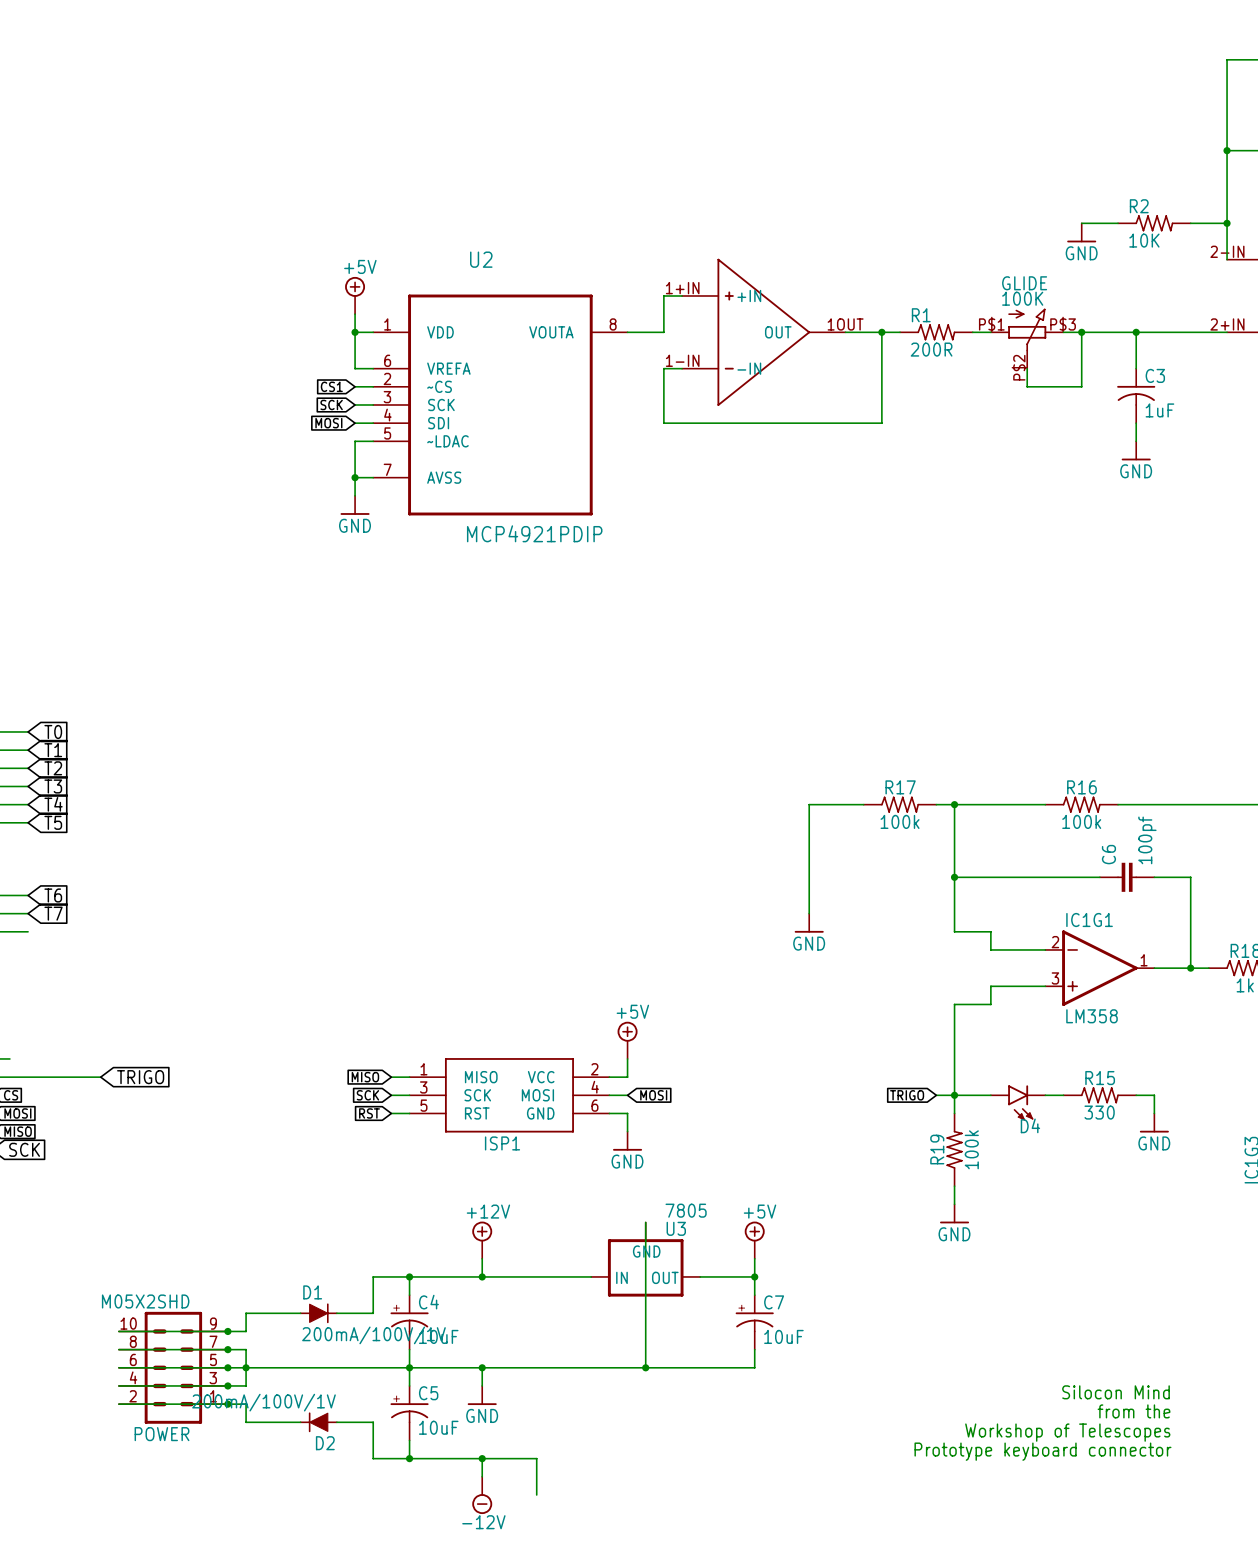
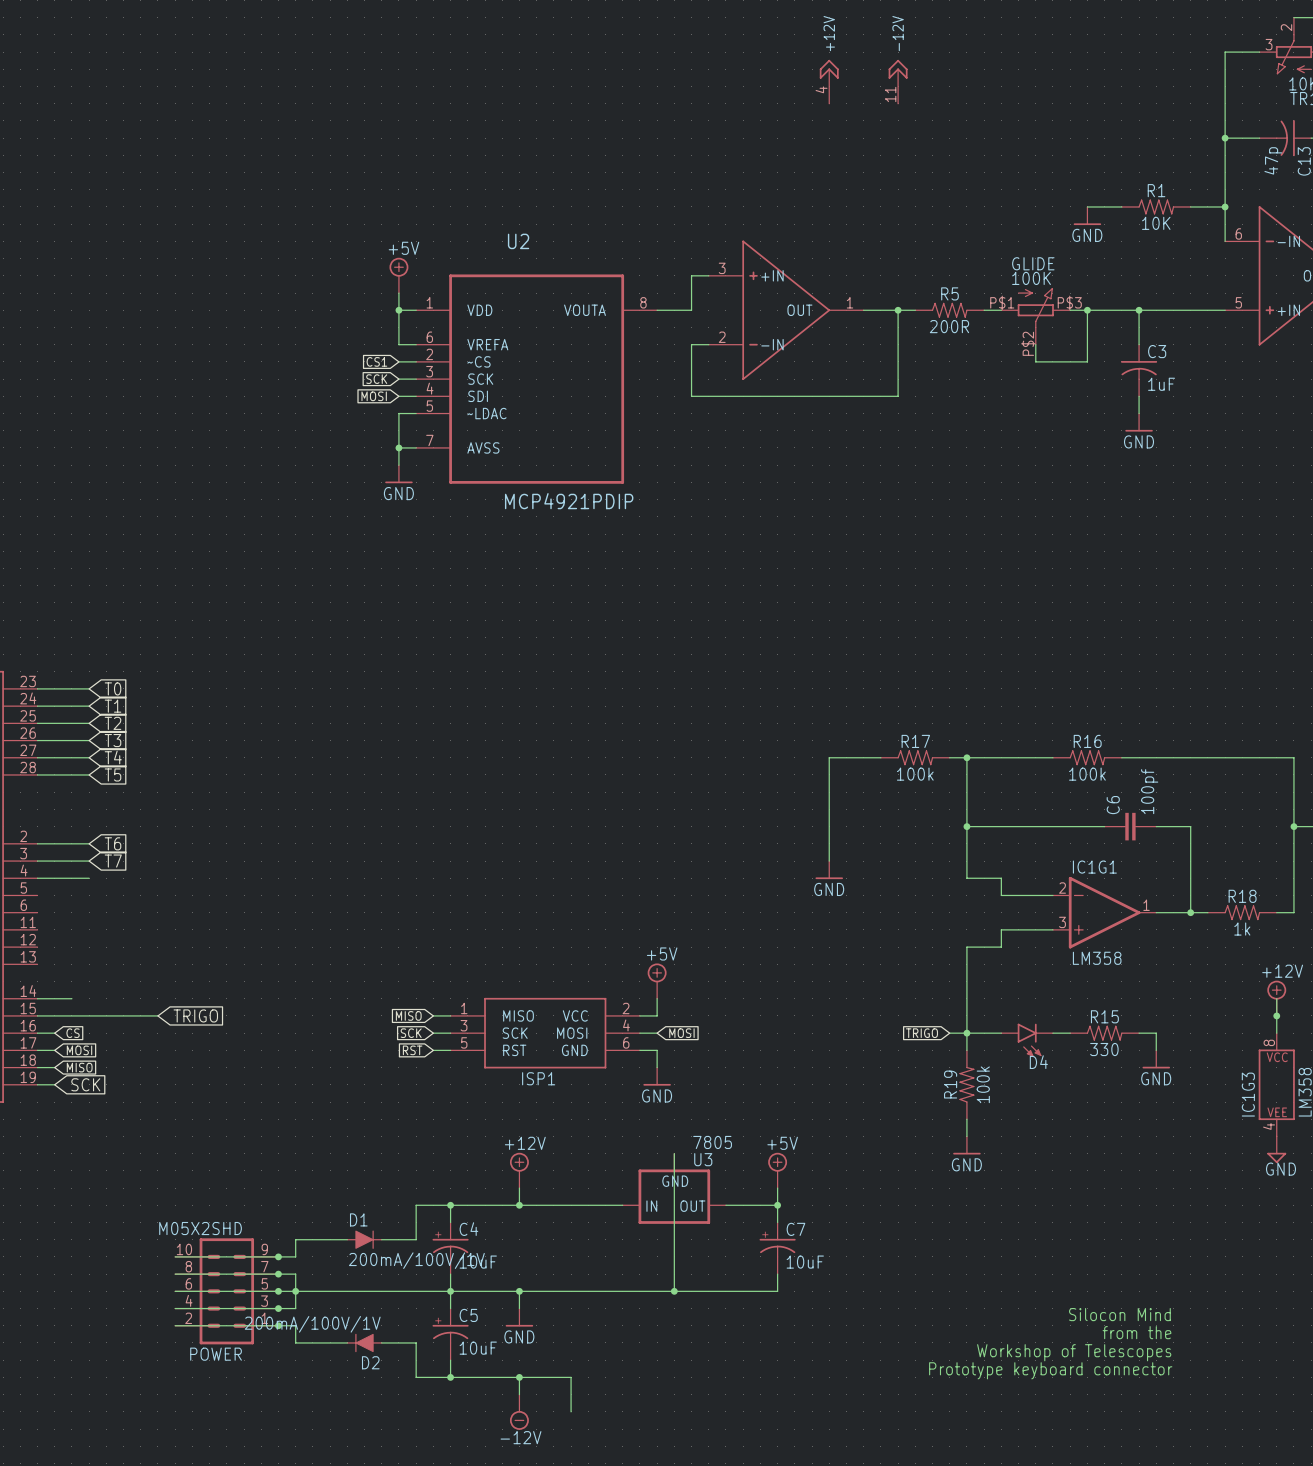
part: none -> (829, 81)
part: none -> (898, 81)
R2: 10K (1154, 223) -> none
part pin number: 2-IN (1227, 251) -> 6 (1238, 233)
part pin number: 1+IN (682, 288) -> 3 (722, 268)
part pin number: 1OUT (845, 324) -> 1 (850, 302)
R1 symbol: [900, 324, 973, 341] -> [1121, 199, 1191, 215]
part pin number: 2+IN (1227, 324) -> 5 (1238, 302)
R5: none -> 200R (949, 310)
R1 value: 200R (931, 349) -> 10K (1156, 223)
part pin number: 1-IN (682, 360) -> 2 (722, 337)

